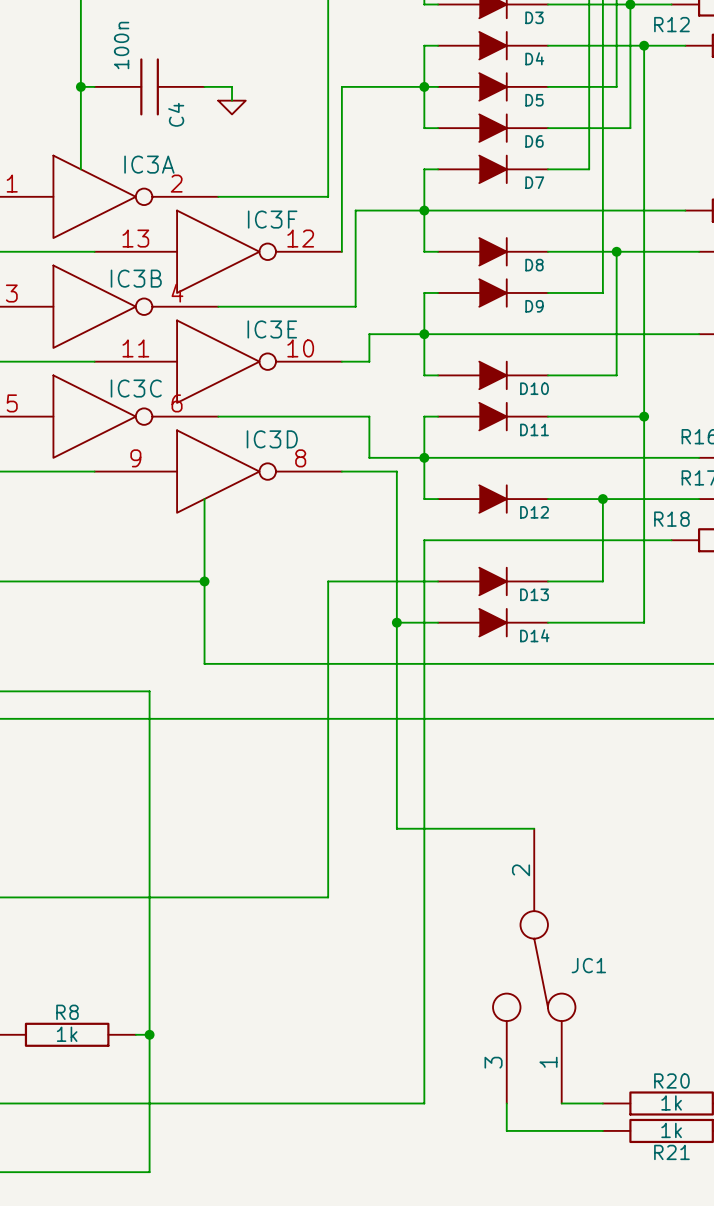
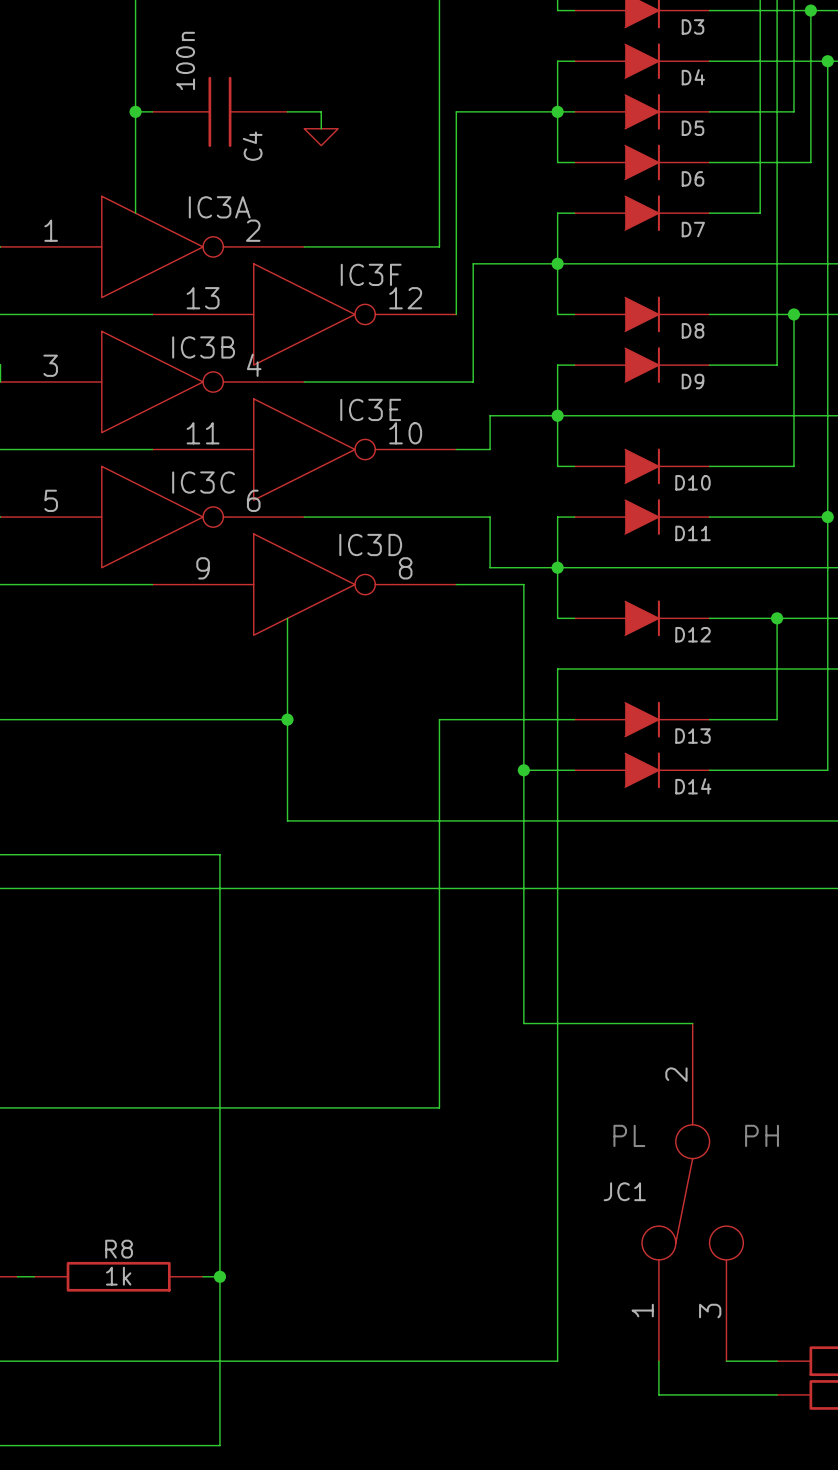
text: none -> PL (629, 1135)
text: none -> PH (762, 1135)
JC1 flip: as is (534, 966) -> left-right (692, 1192)

